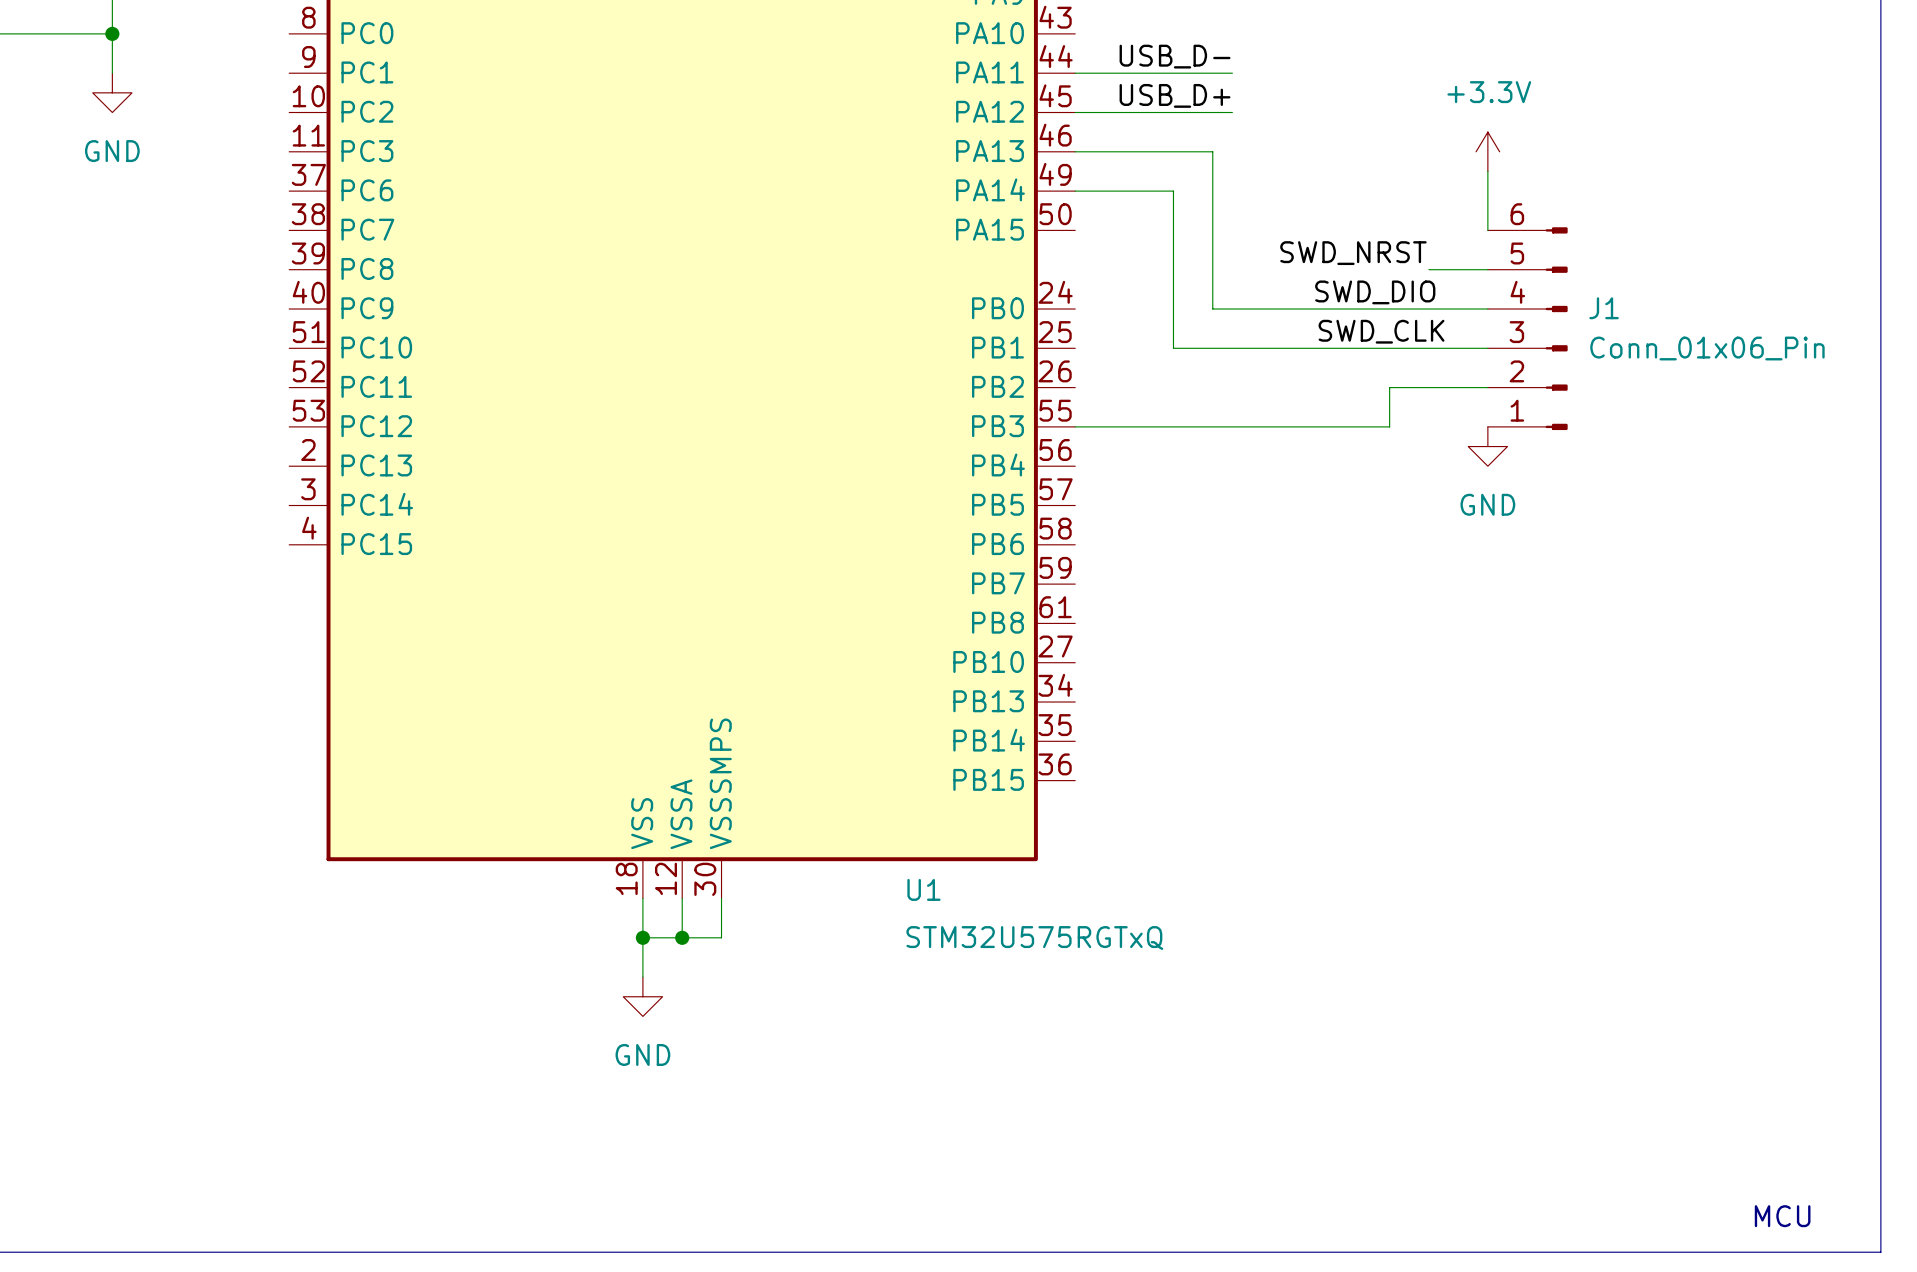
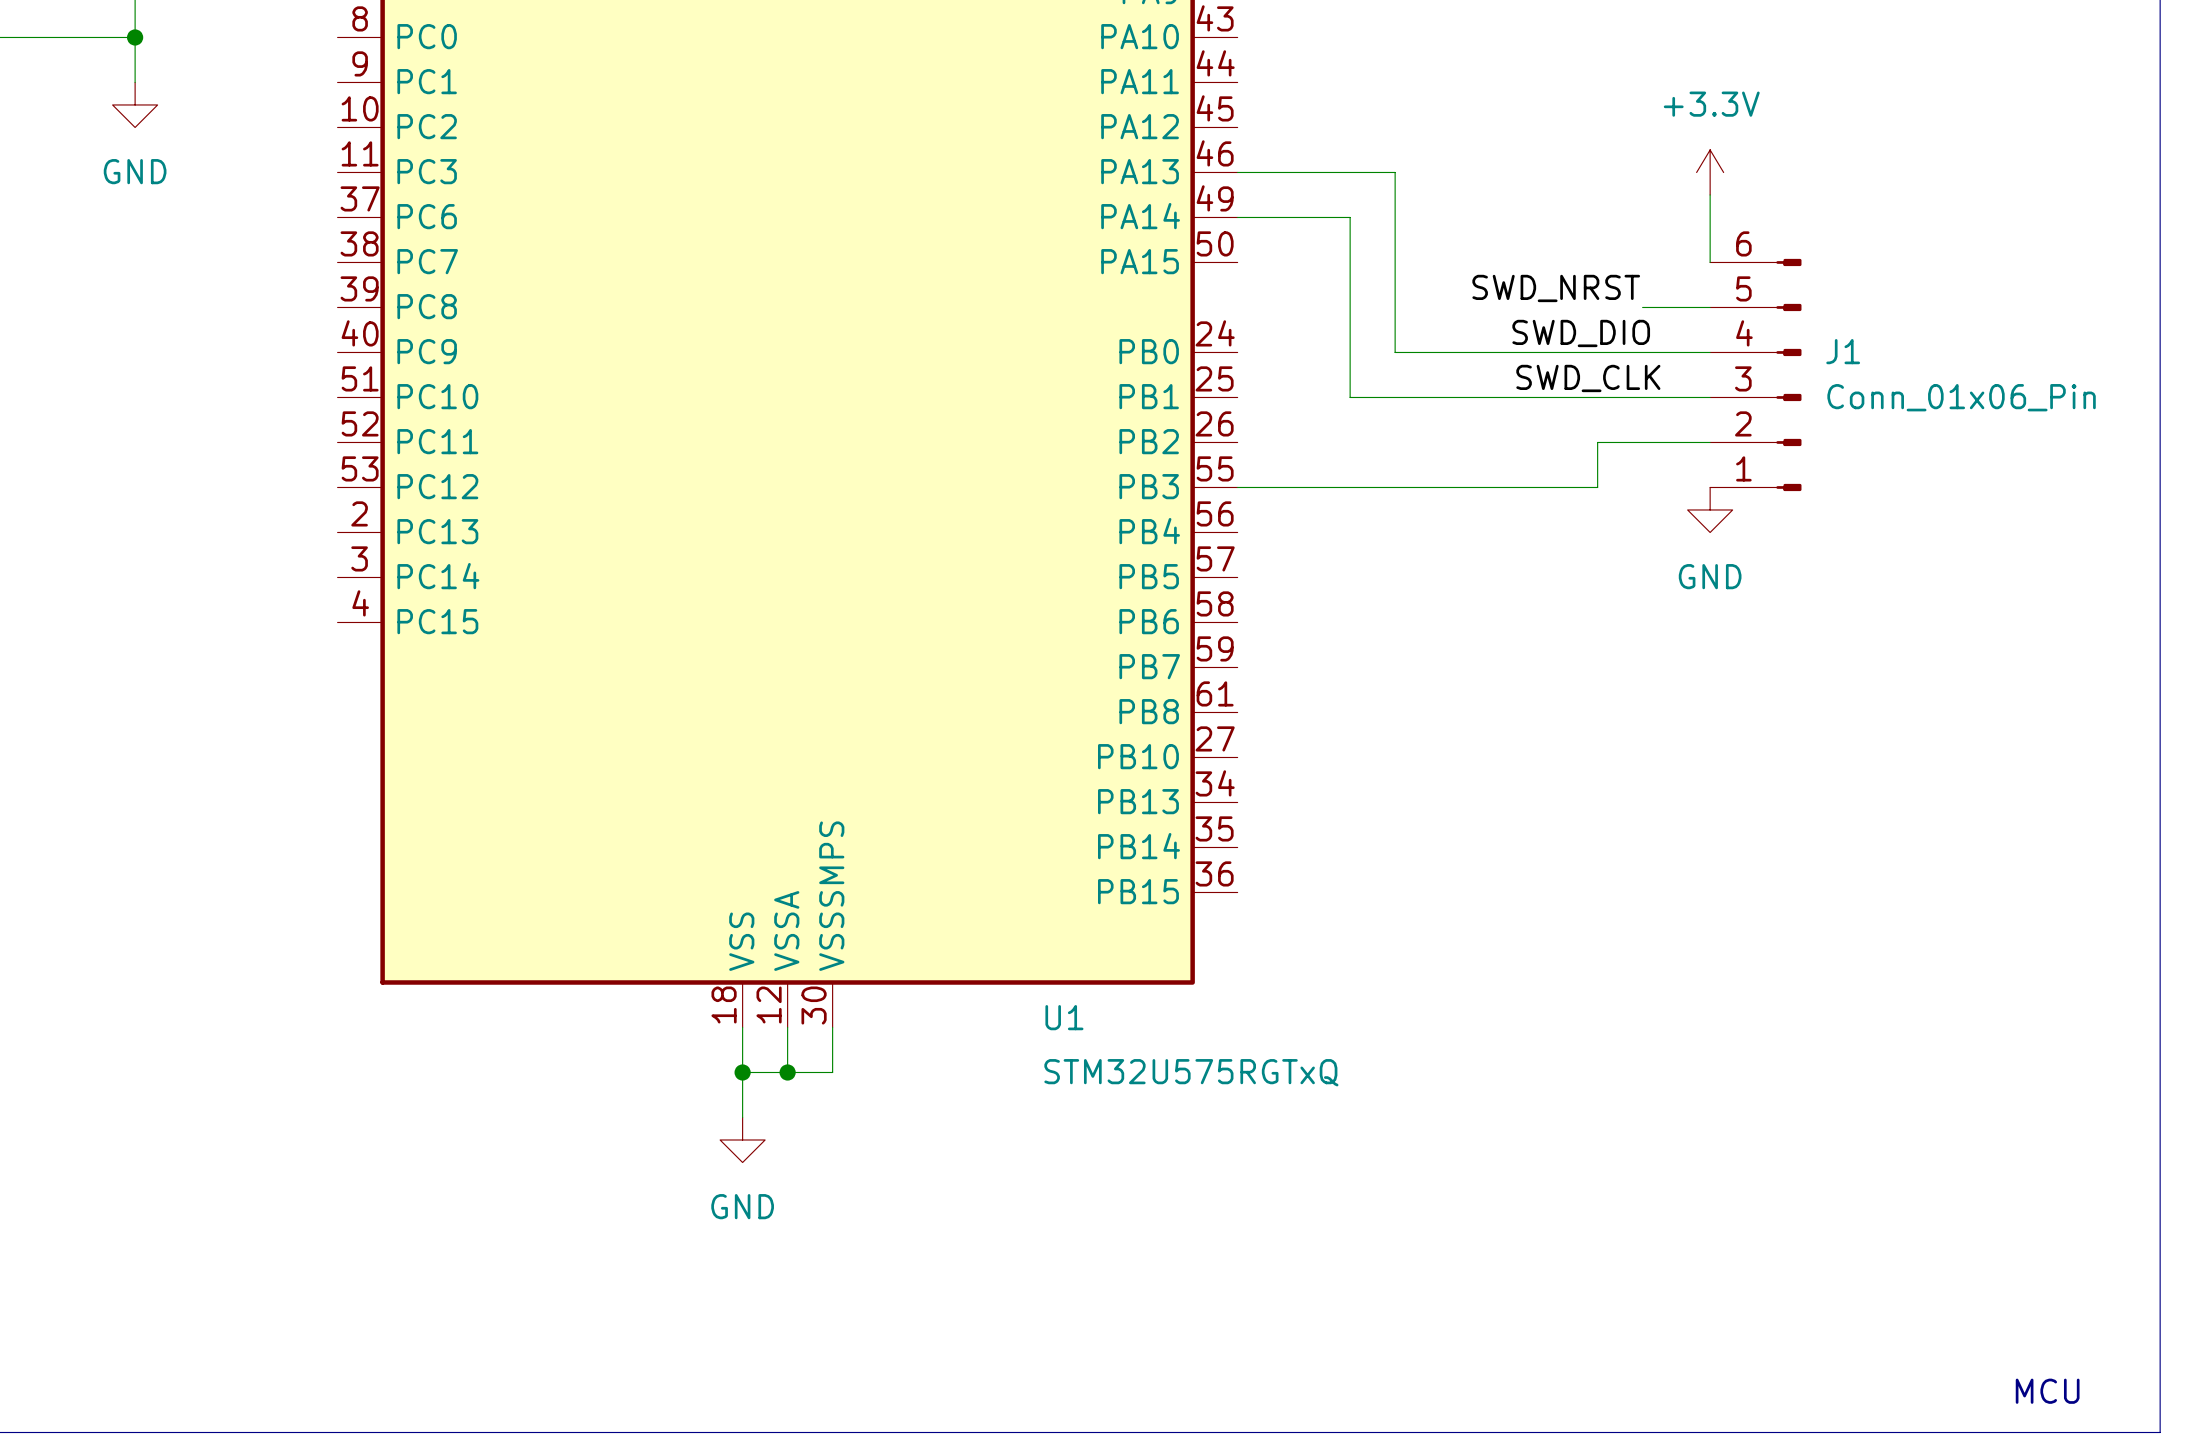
label: USB_D- (1175, 56) -> none
wire: (1075, 73) (1232, 73) -> none
label: USB_D+ (1175, 95) -> none
wire: (1075, 112) (1232, 112) -> none

